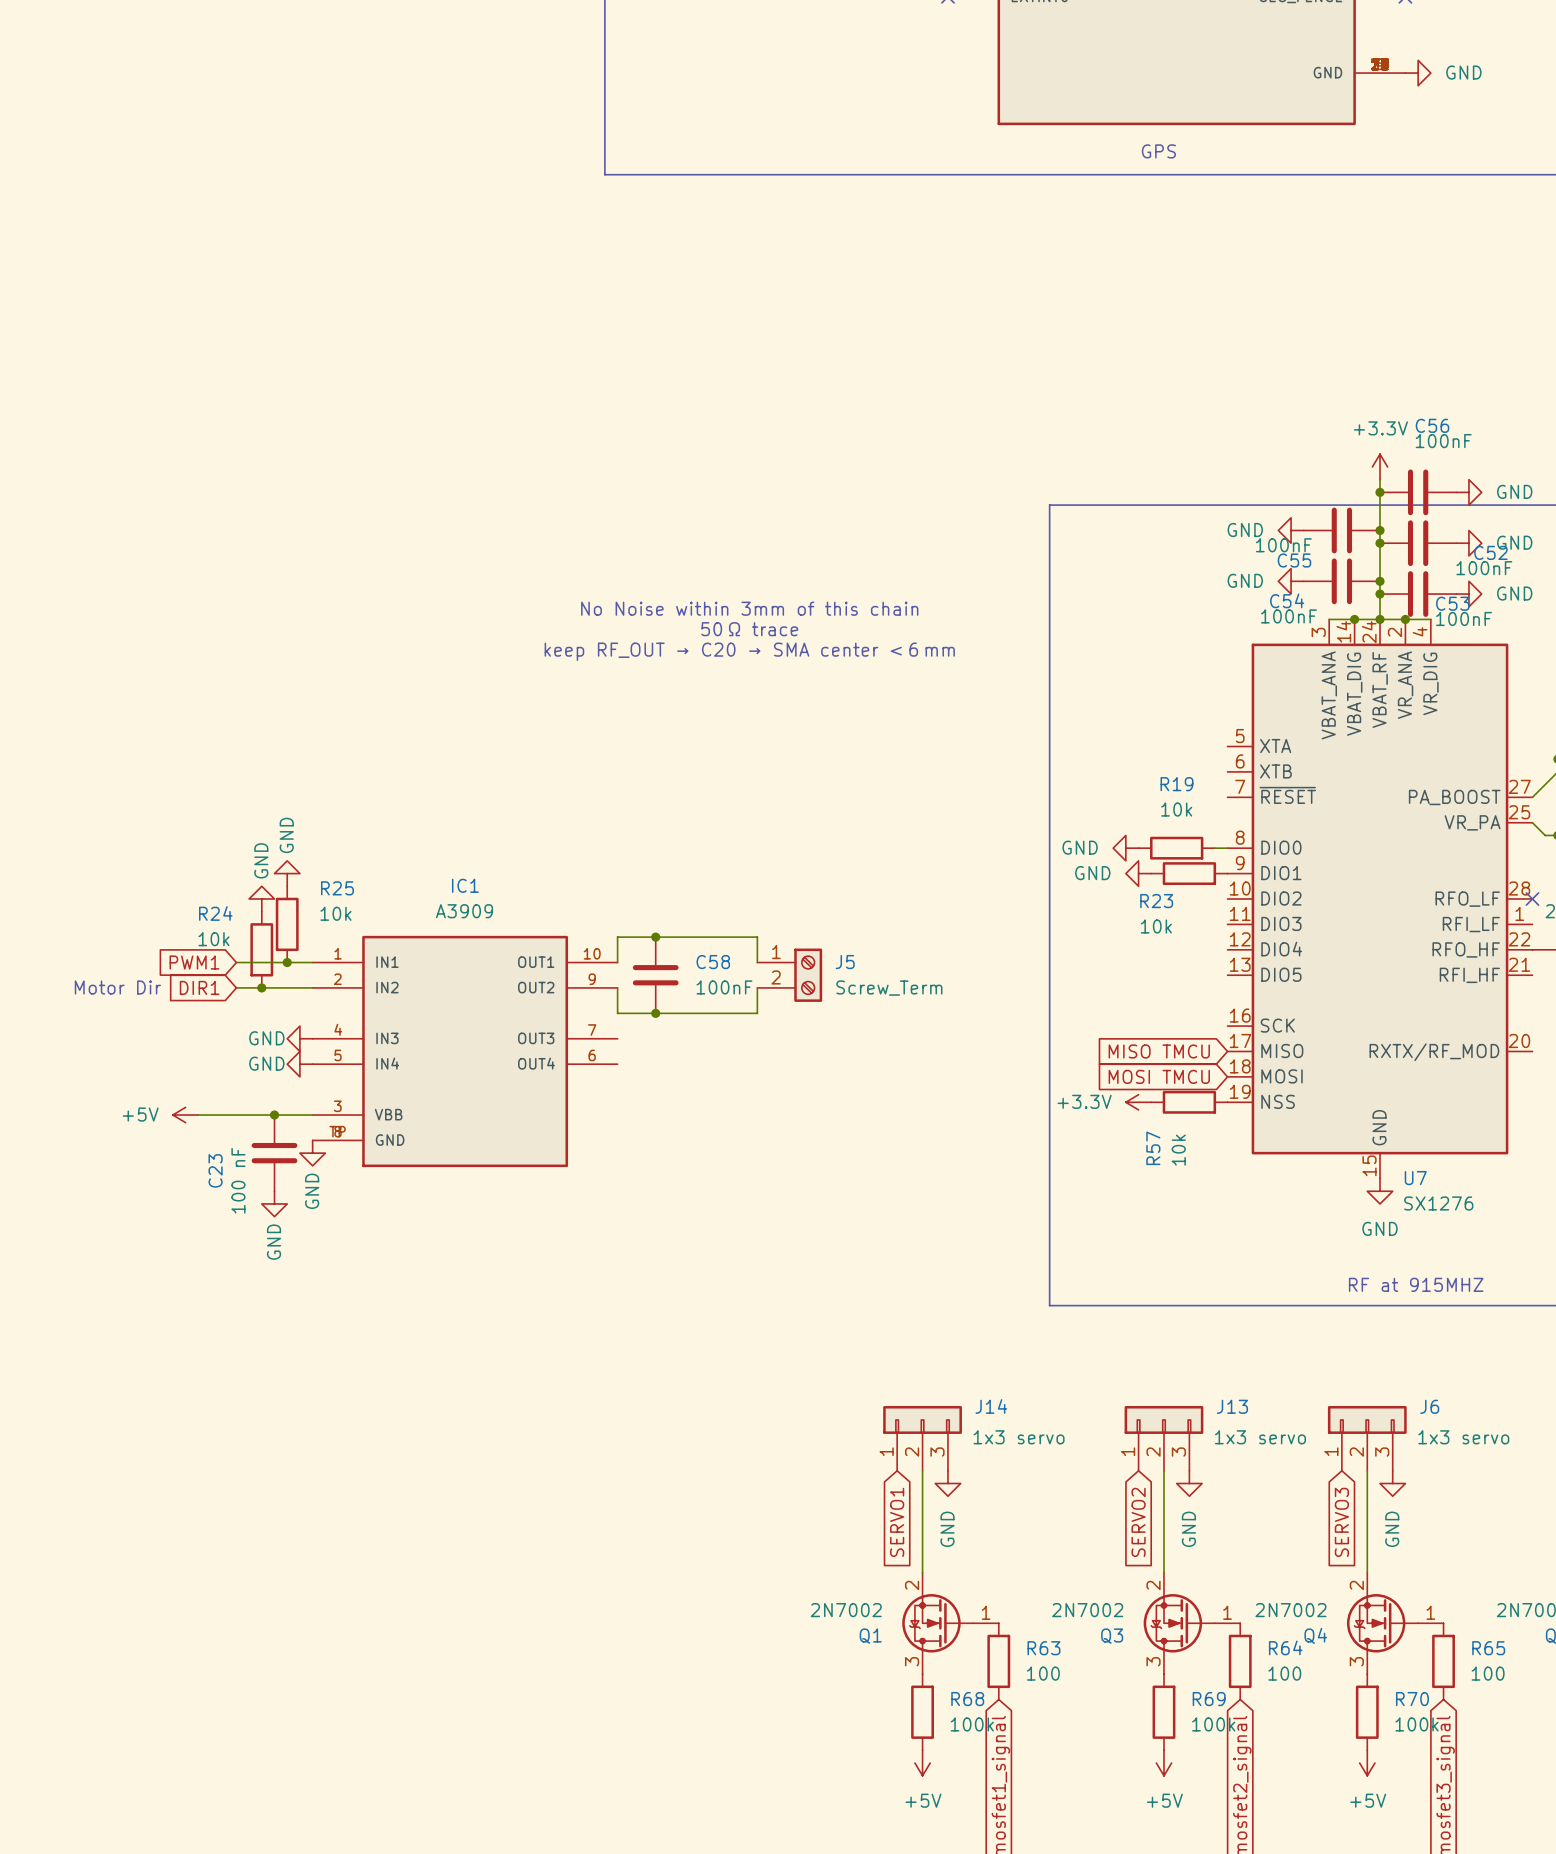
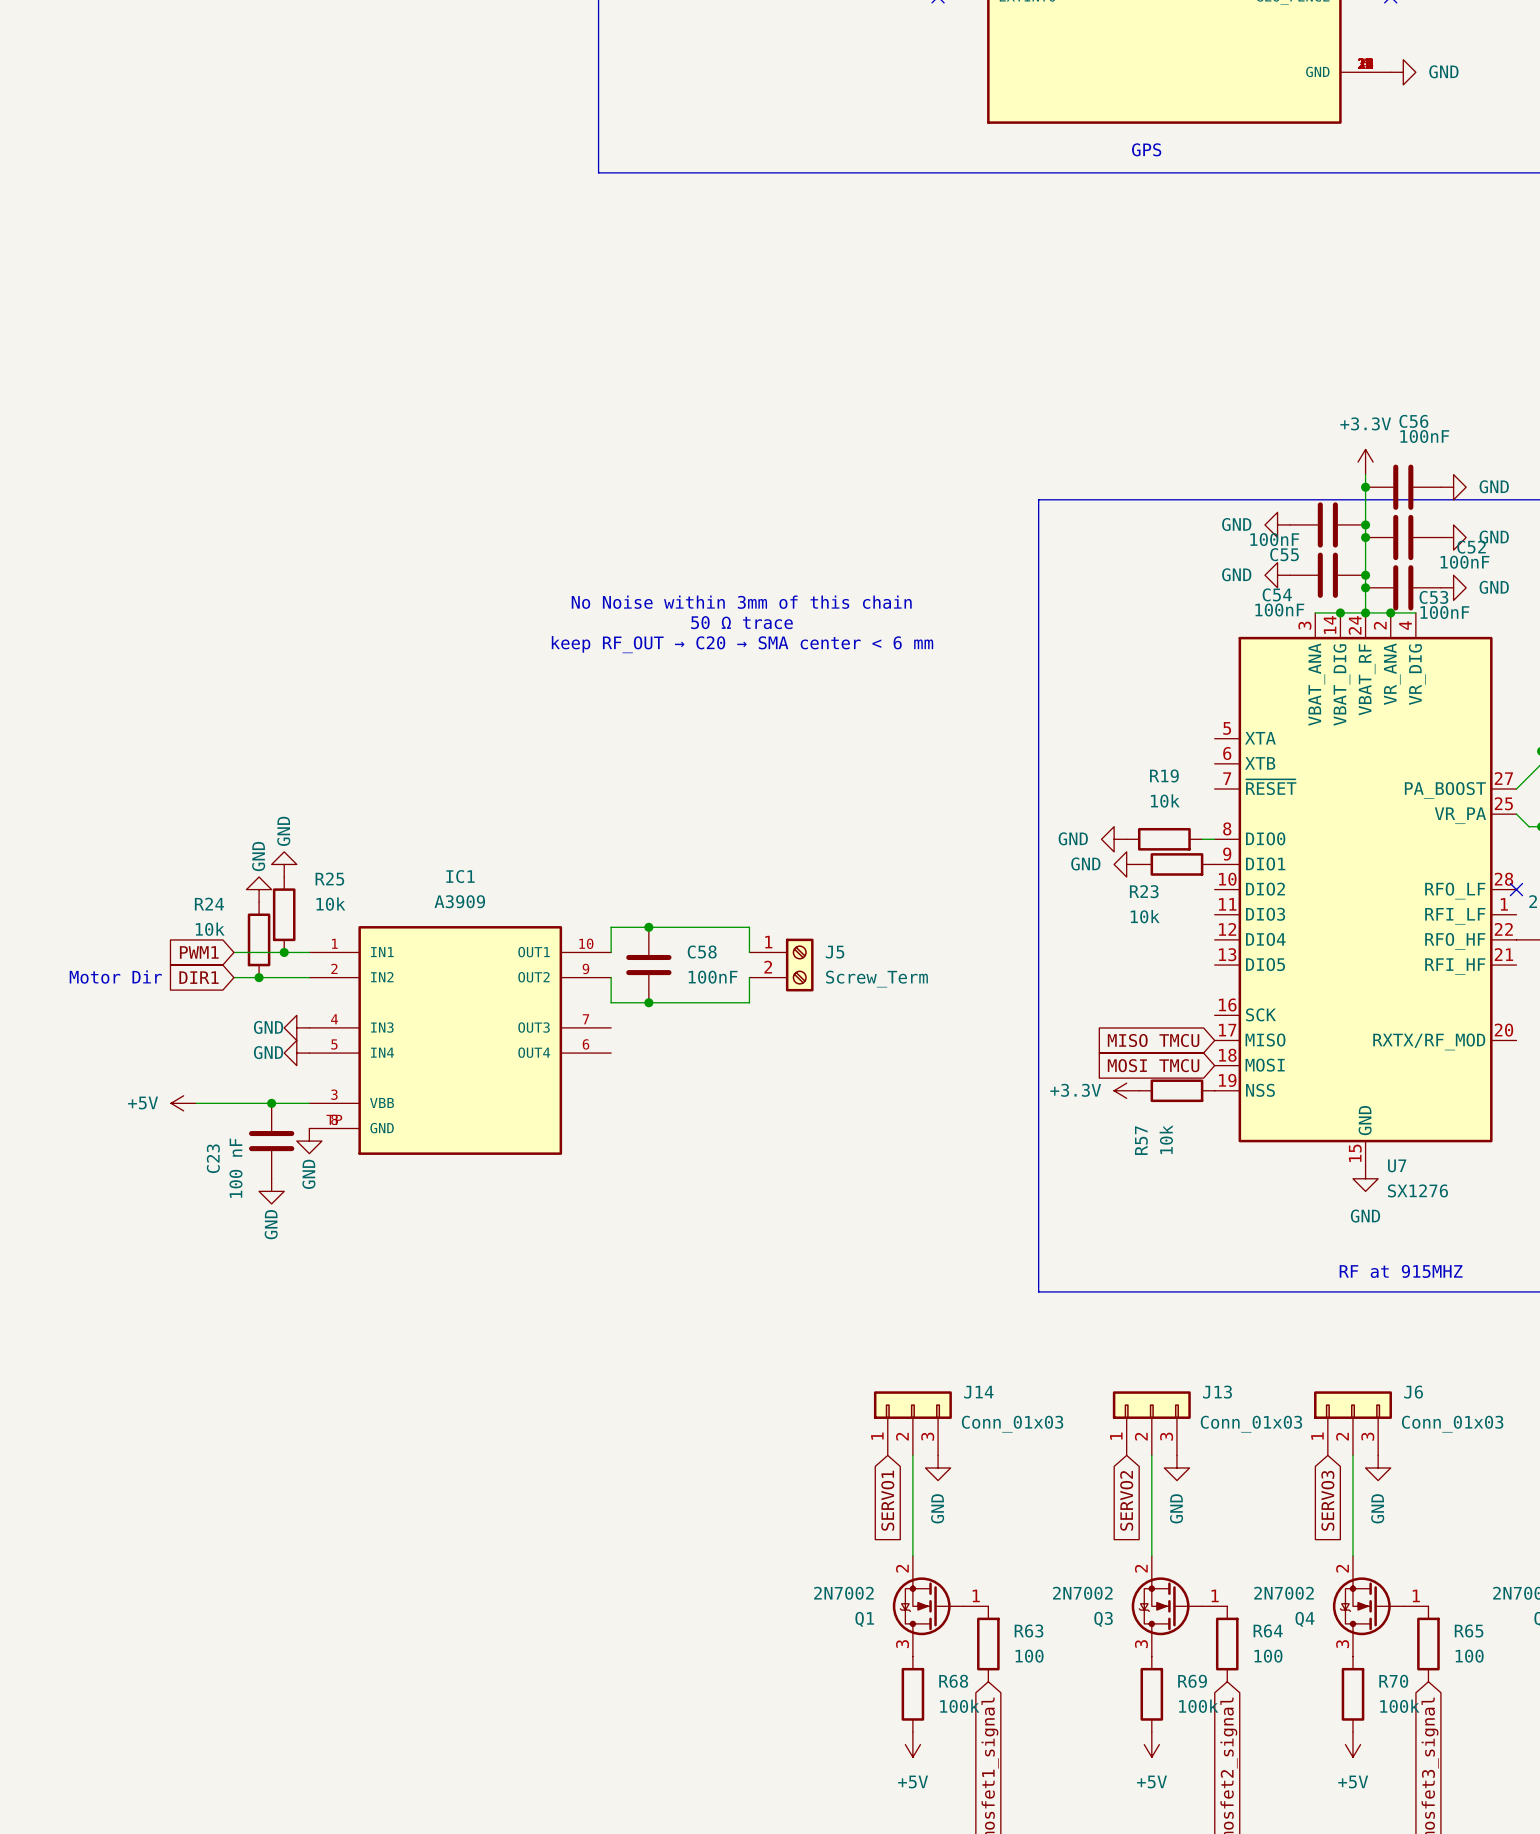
J14 value: 1x3 servo (1019, 1437) -> Conn_01x03 (1012, 1424)
J13 value: 1x3 servo (1260, 1437) -> Conn_01x03 (1251, 1424)
J6 value: 1x3 servo (1463, 1437) -> Conn_01x03 (1452, 1424)

